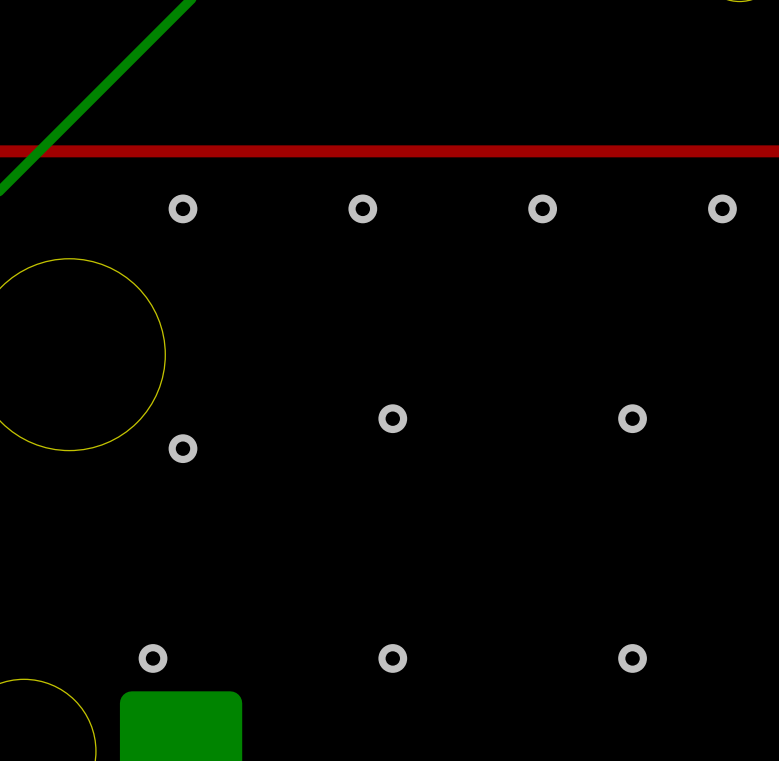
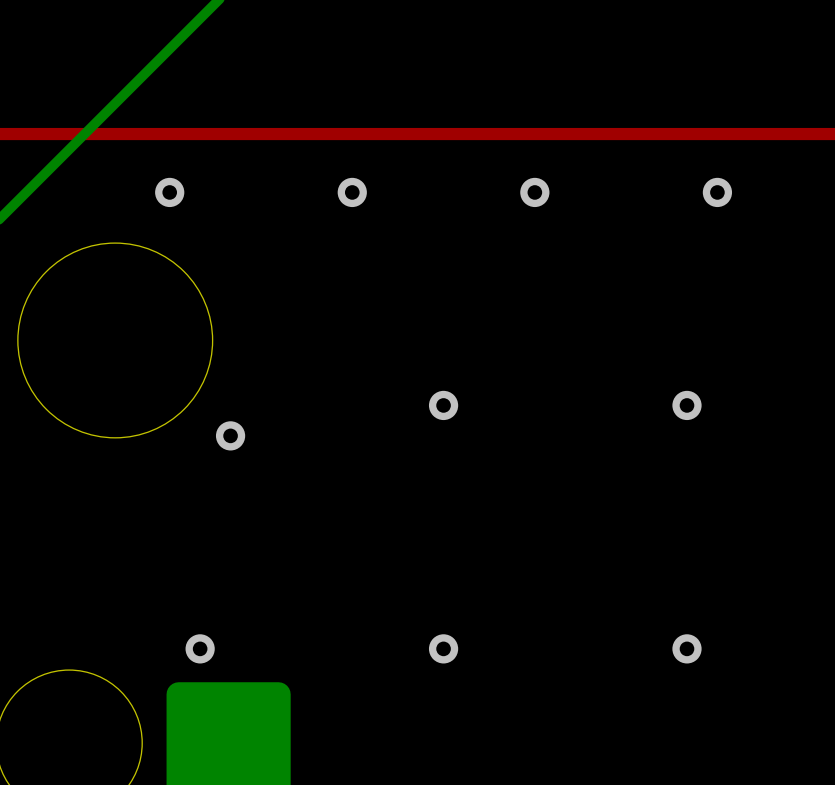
via: none -> (169, 192)
via: (182, 208) -> none
via: none -> (352, 192)
via: (362, 208) -> none
via: none -> (534, 192)
via: (542, 208) -> none
via: none -> (717, 192)
via: (722, 208) -> none

